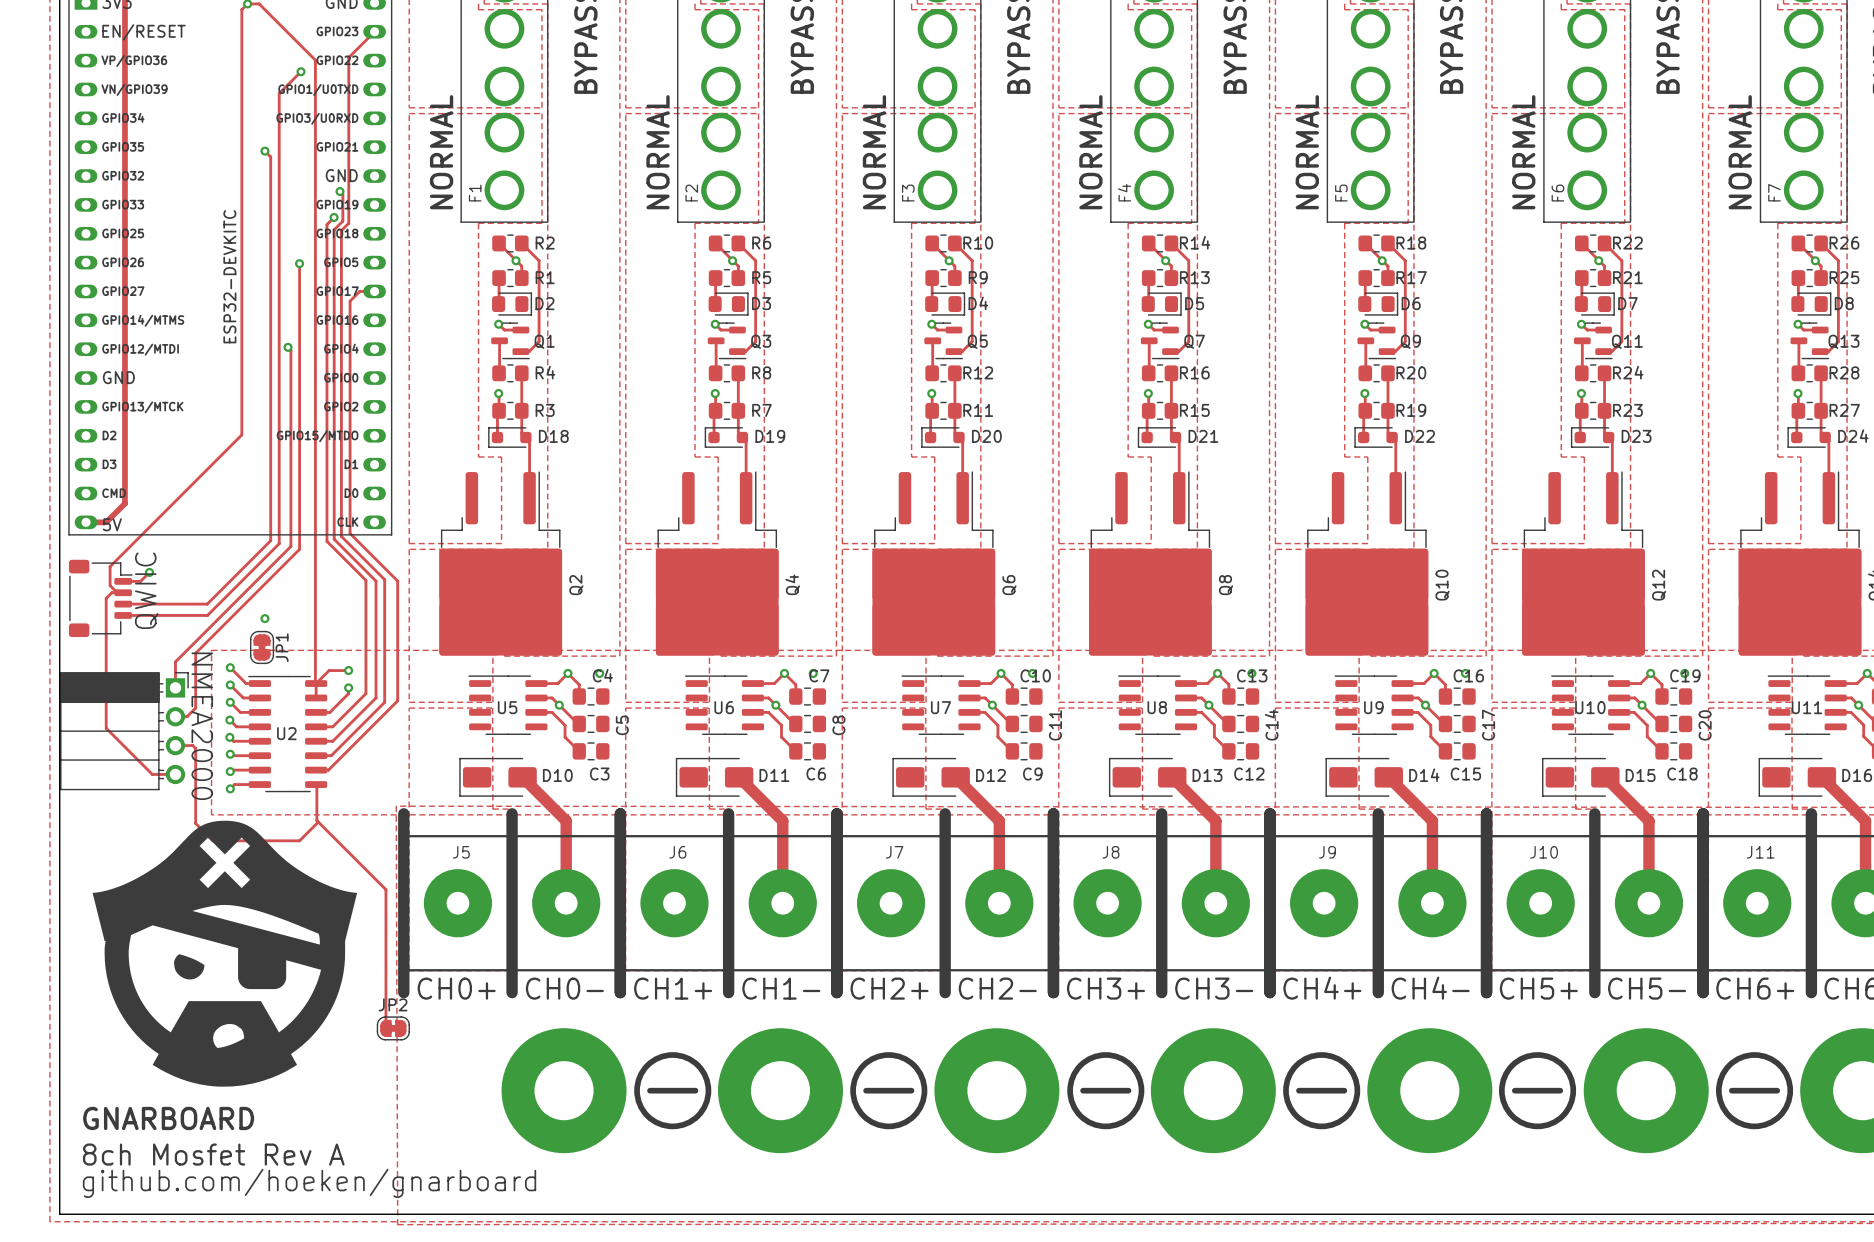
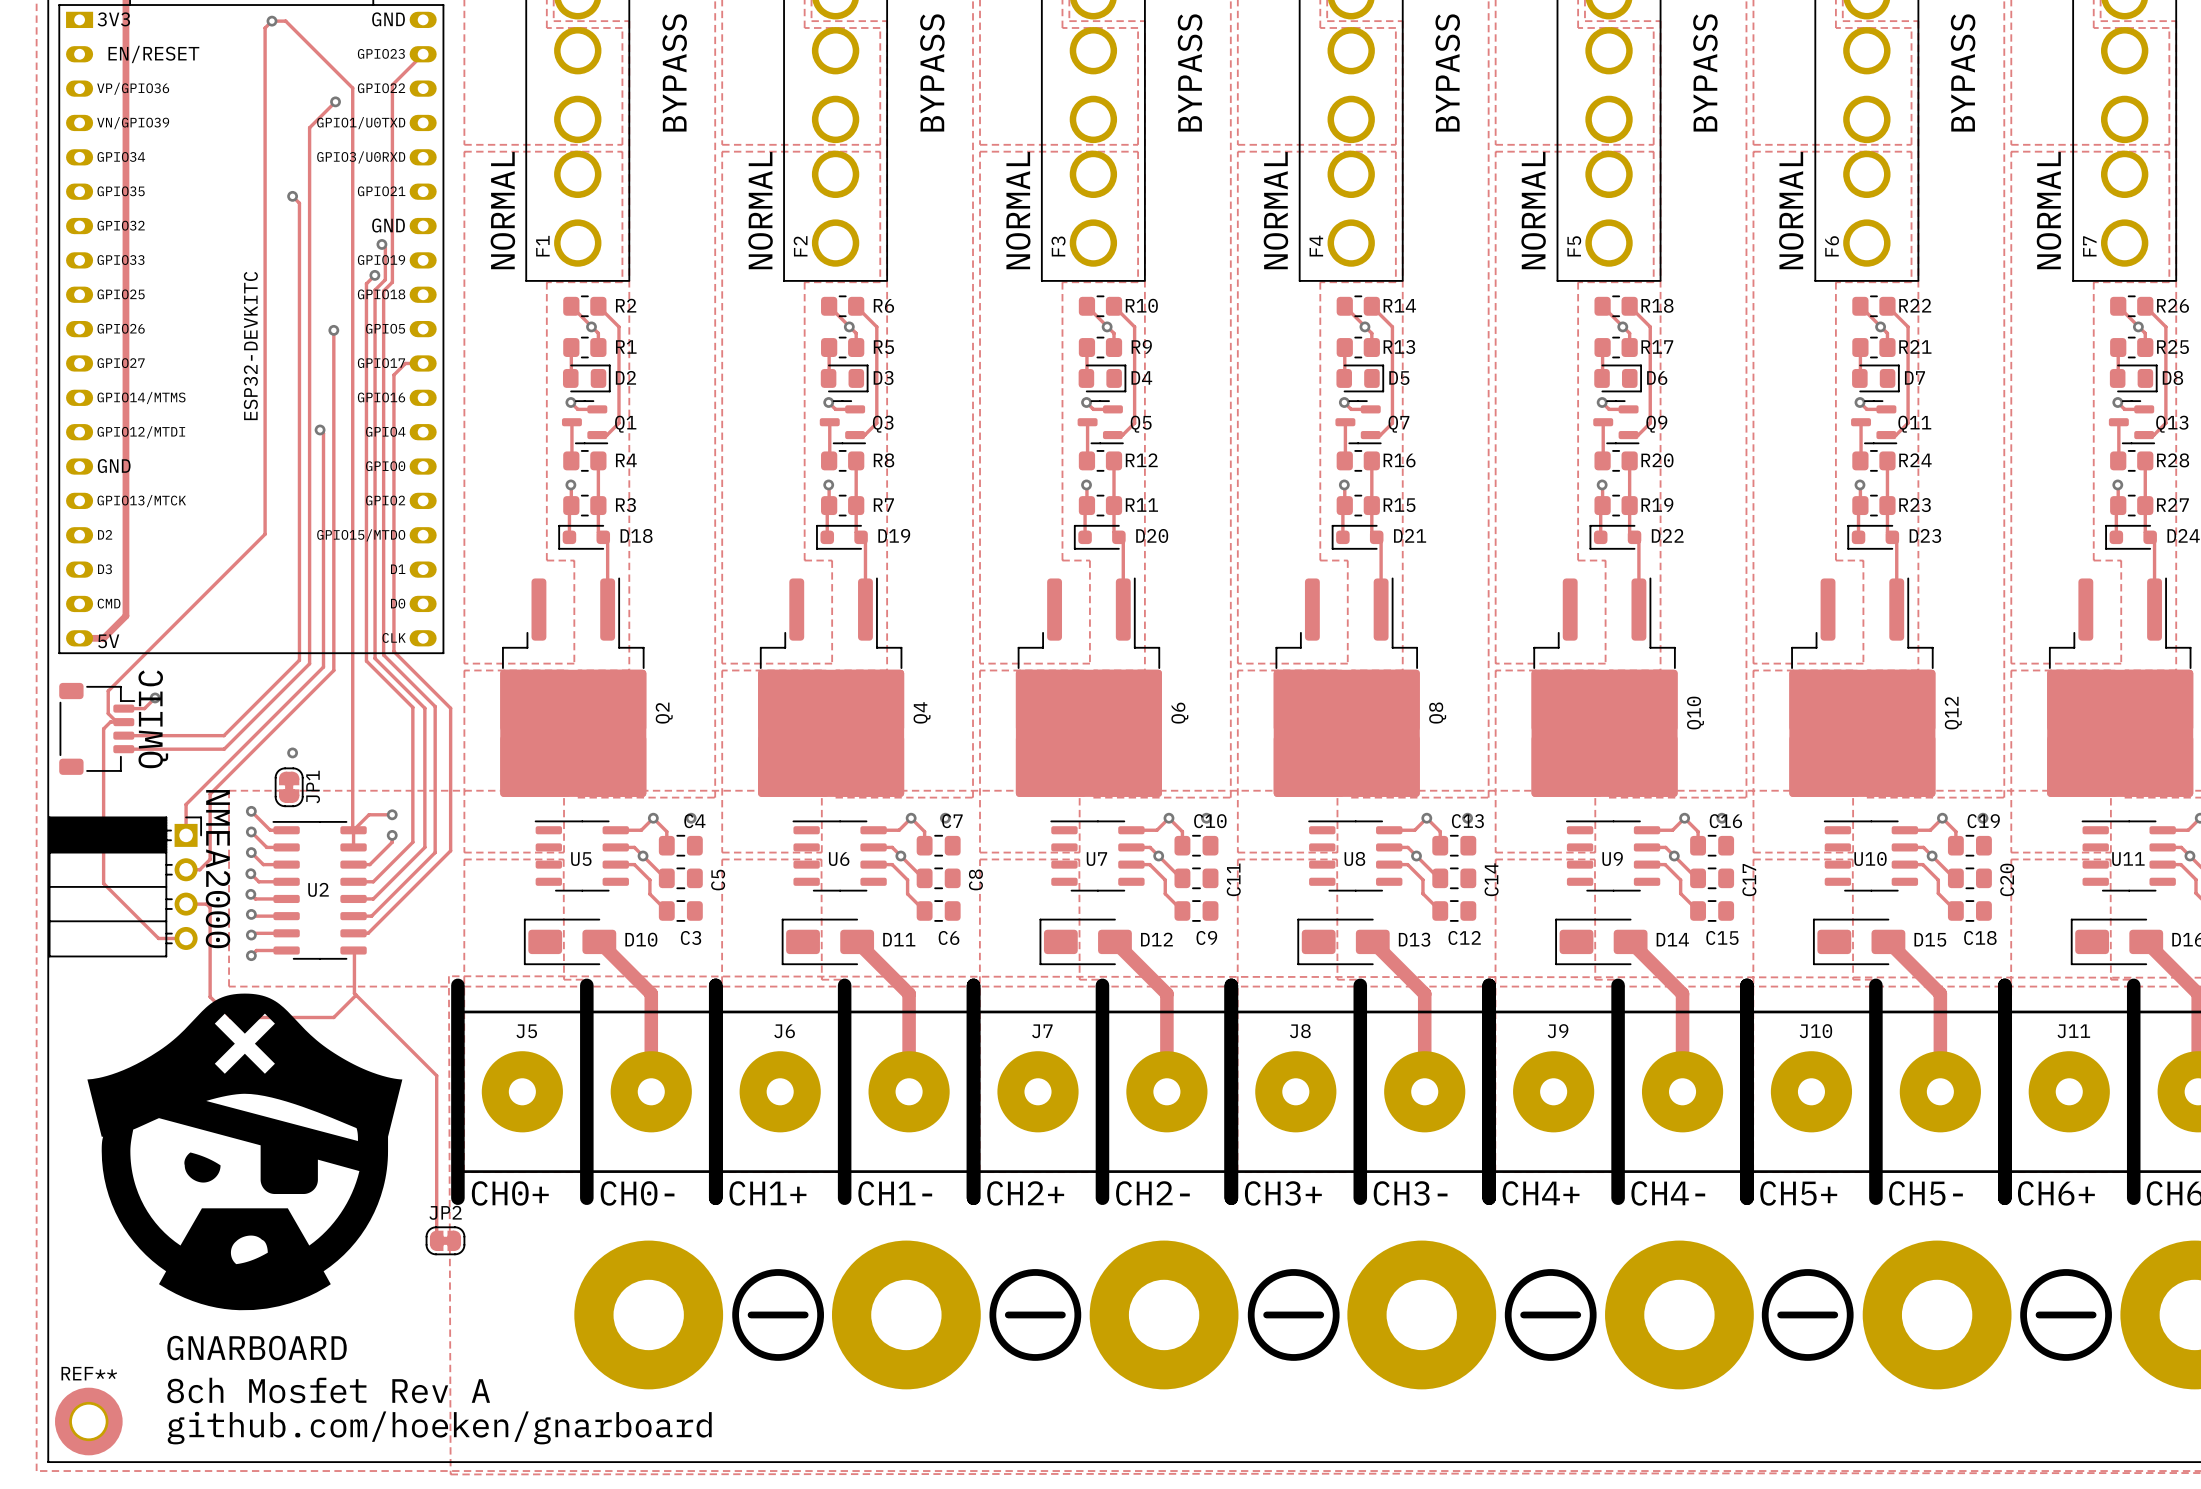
text position: GNARBOARD (168, 1118) -> GNARBOARD (257, 1348)
text position: 8ch Mosfet Rev A (213, 1154) -> 8ch Mosfet Rev A (328, 1390)
REF**: none -> (88, 1421)
text position: github.com/hoeken/gnarboard (309, 1183) -> github.com/hoeken/gnarboard (439, 1427)

